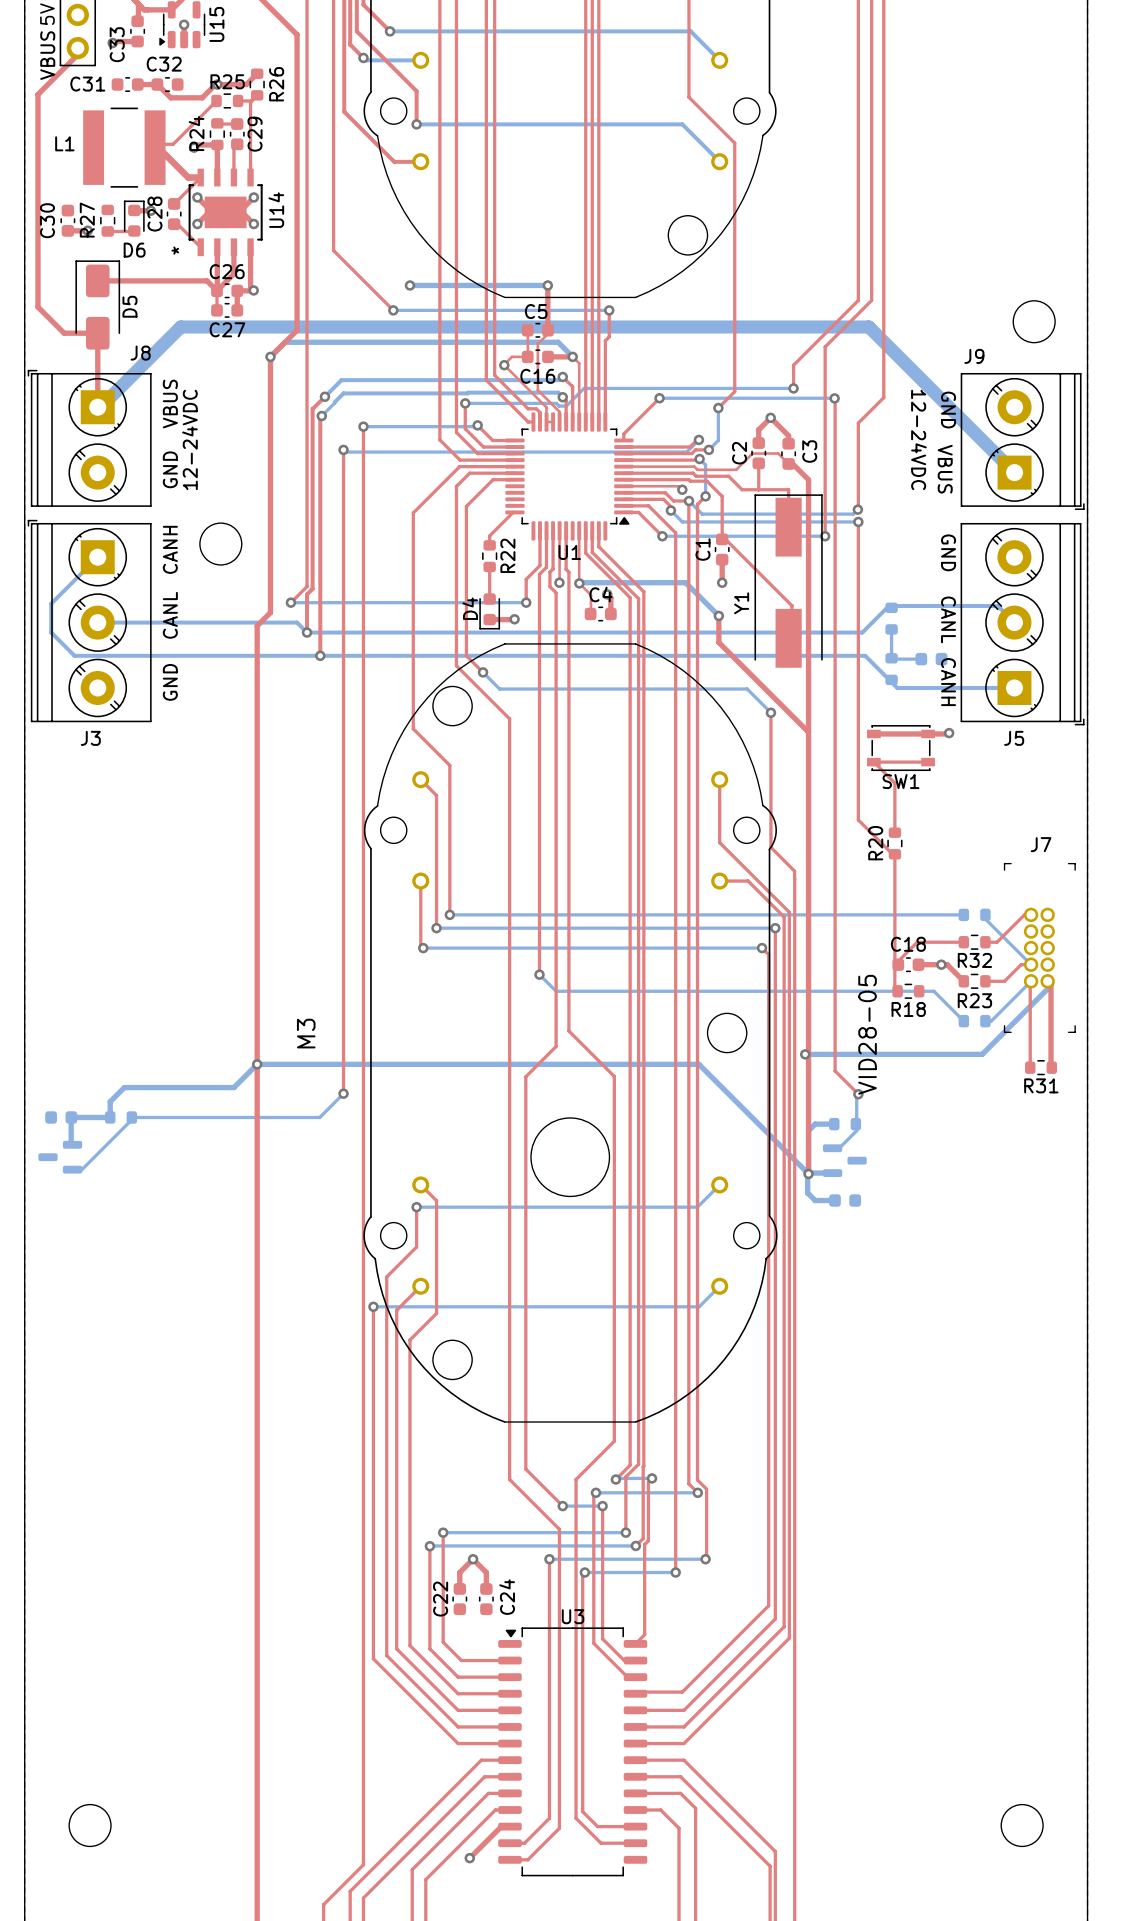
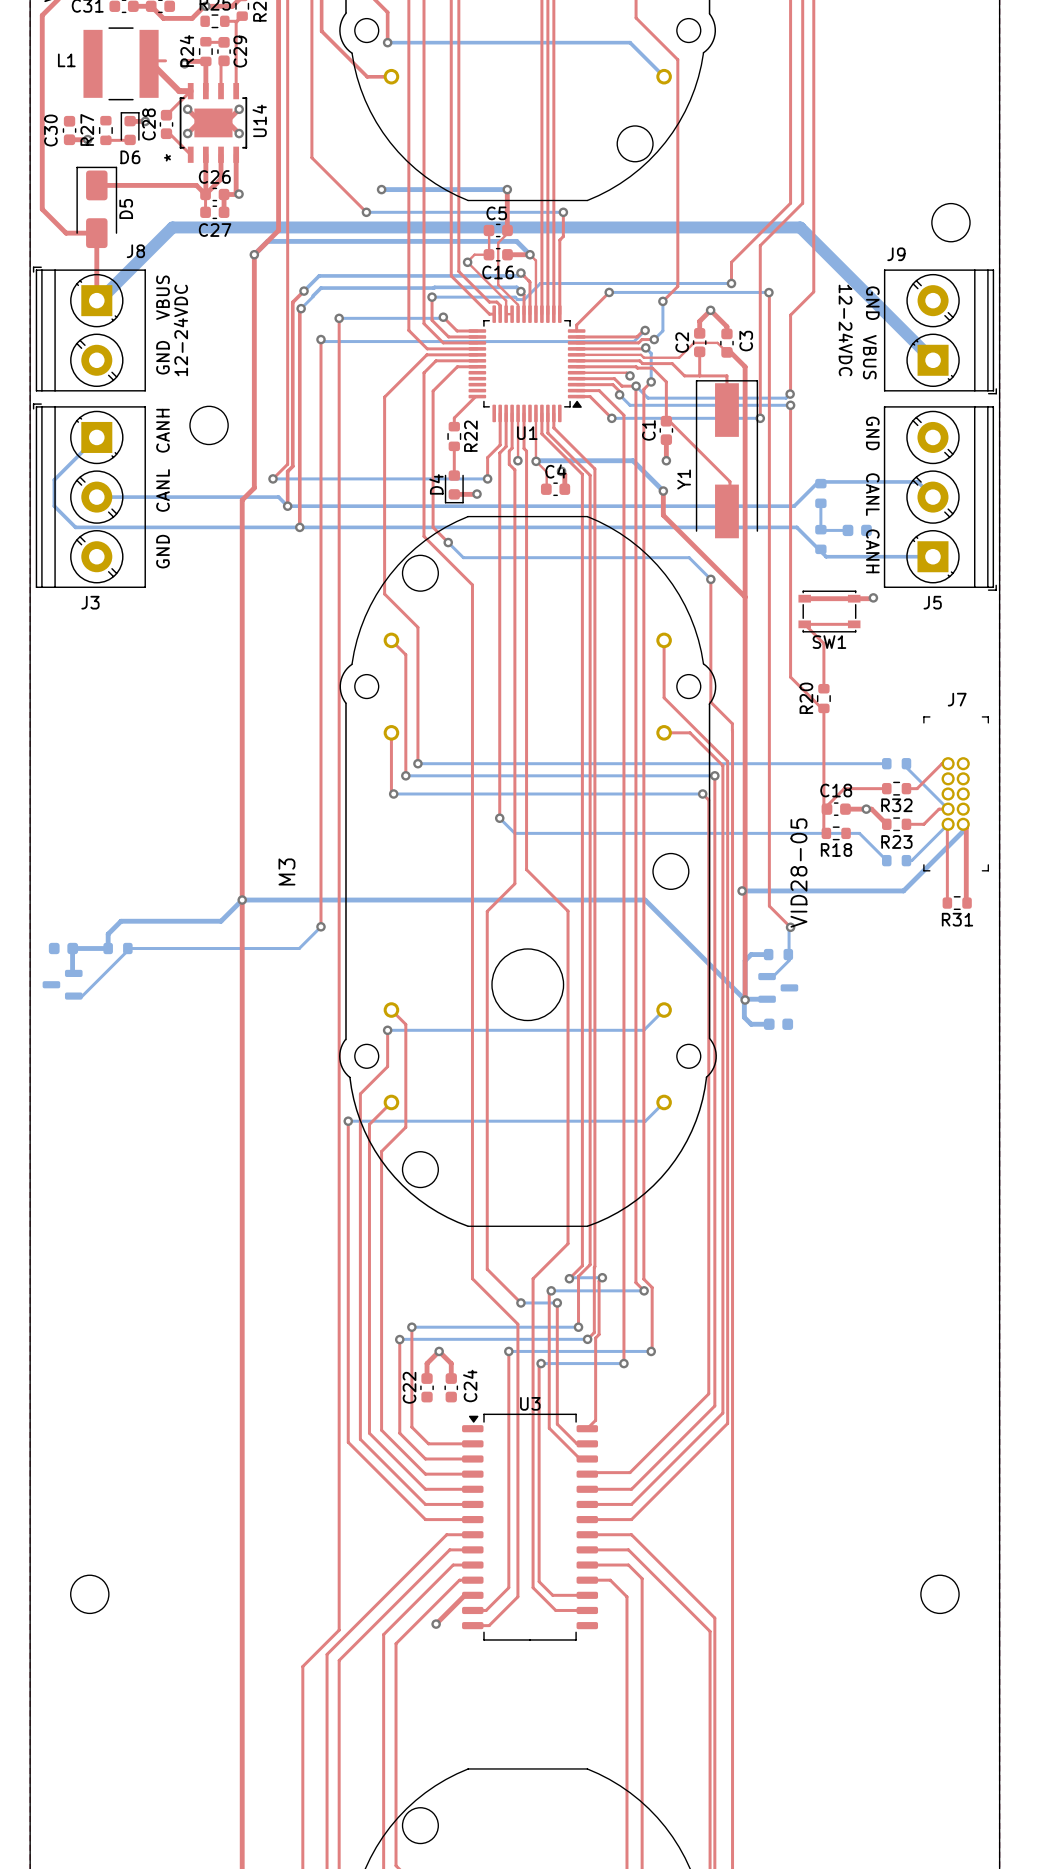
top track: (216, 100) (173, 144) -> none

